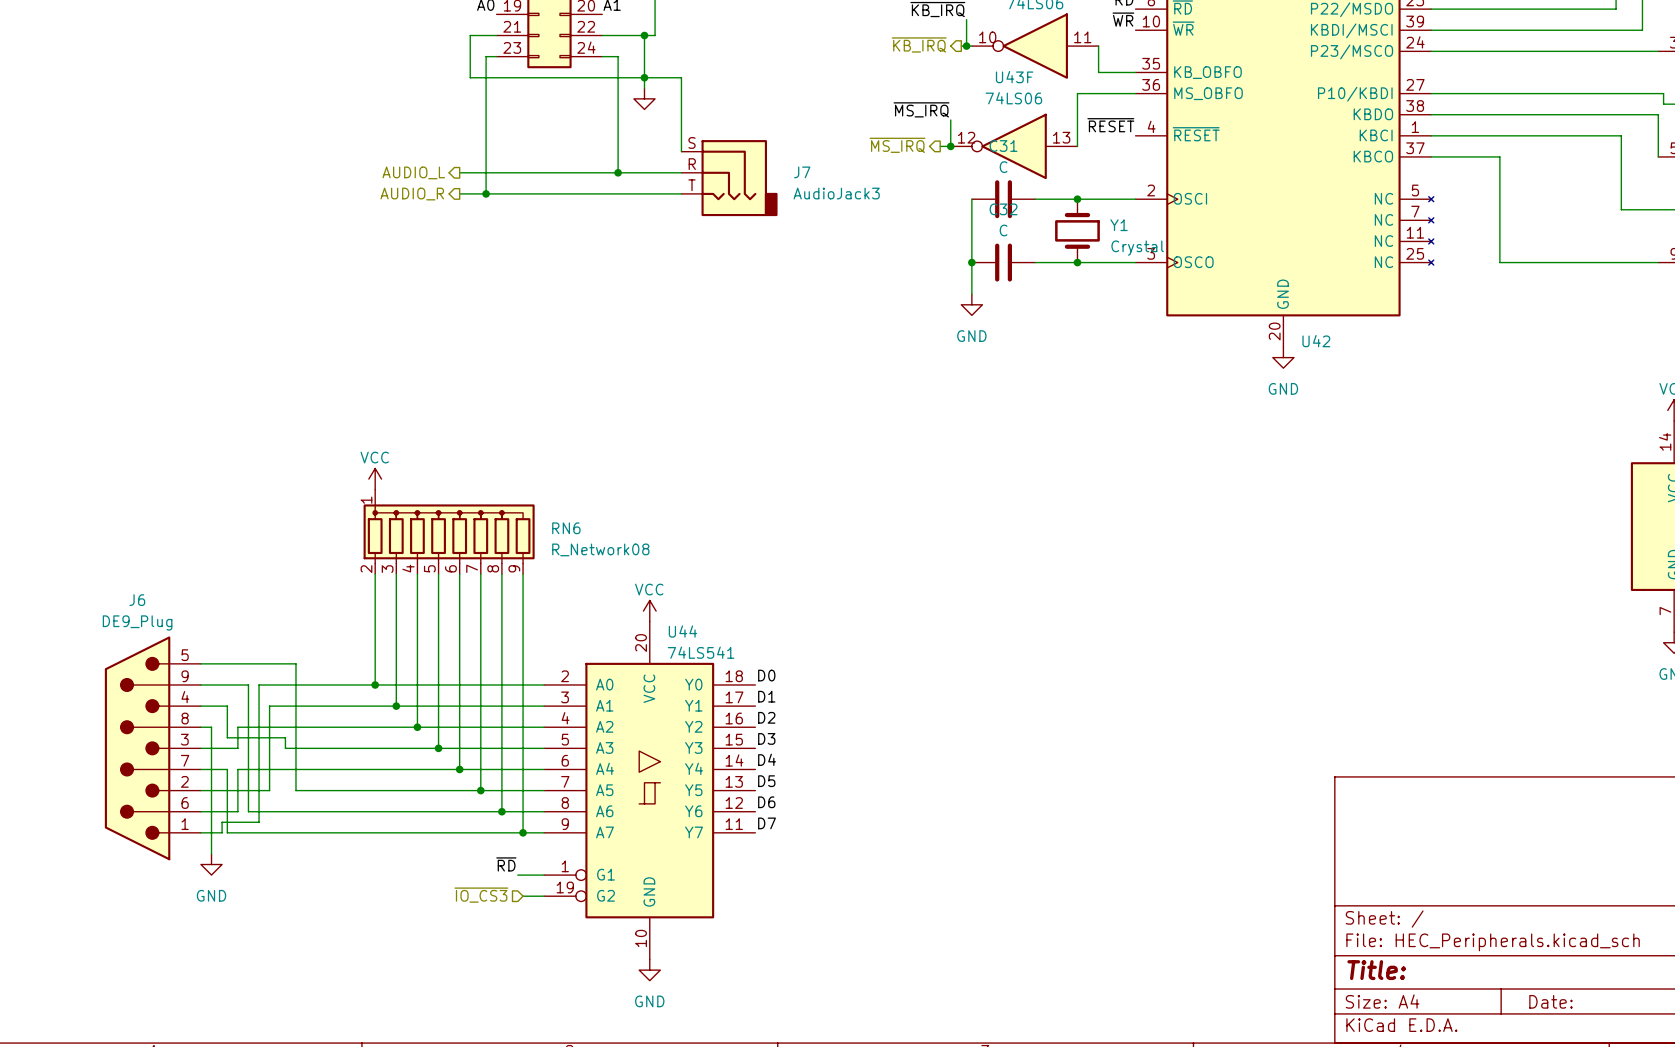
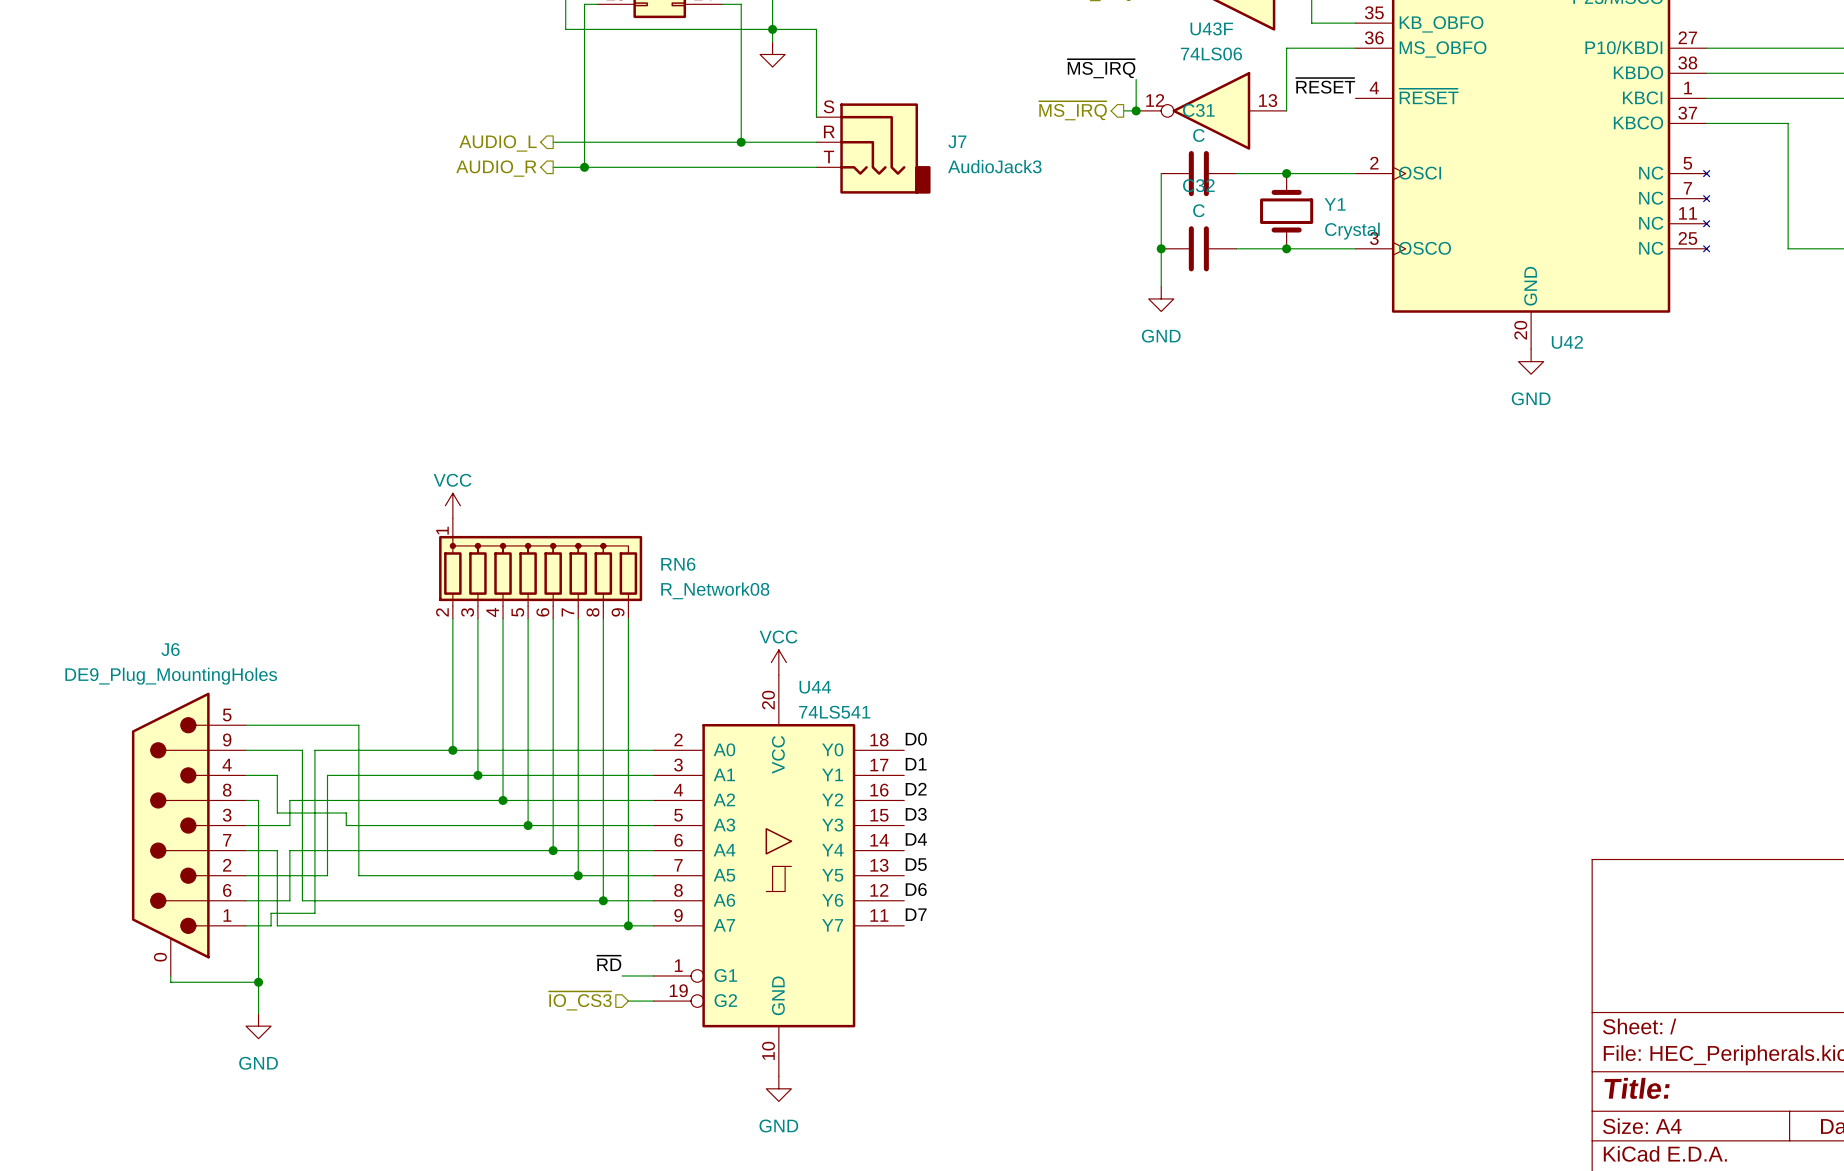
J6 value: DE9_Plug (137, 622) -> DE9_Plug_MountingHoles (171, 676)
J6 symbol: [104, 636, 201, 861] -> [131, 692, 247, 976]
wire: none -> (258, 950) (258, 1013)
power symbol position: GND (211, 864) -> GND (258, 1026)
wire: none -> (170, 975) (170, 982) (258, 982)
junction: none -> (258, 982)

